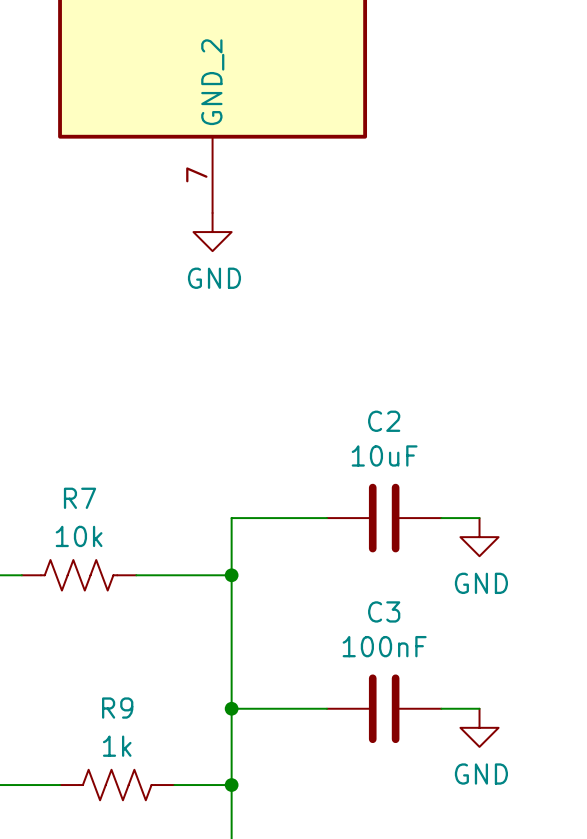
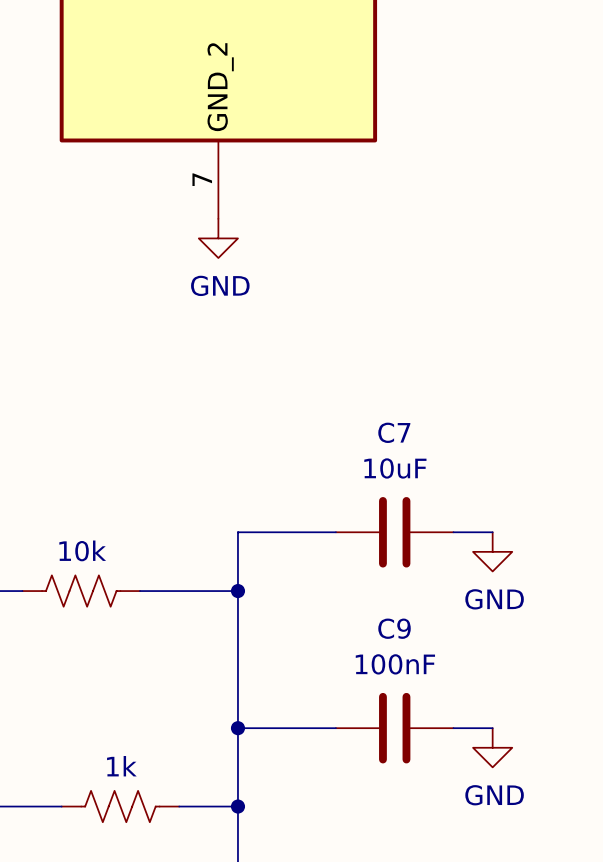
C2 name: C2 (384, 421) -> C7 (394, 432)
R7 name: R7 (80, 498) -> none
C3 name: C3 (384, 611) -> C9 (394, 628)
R9 name: R9 (117, 708) -> none

